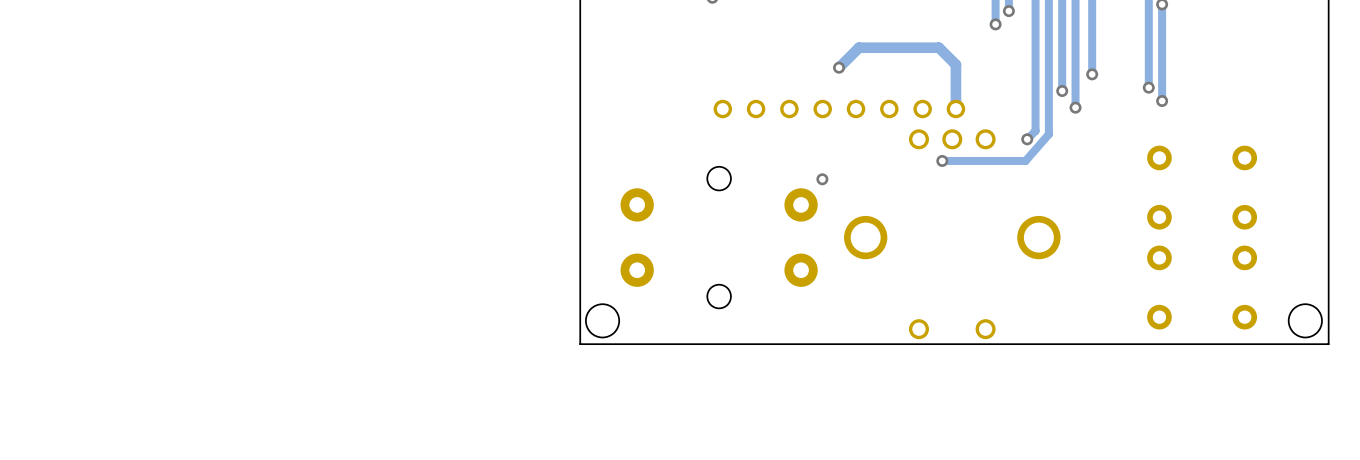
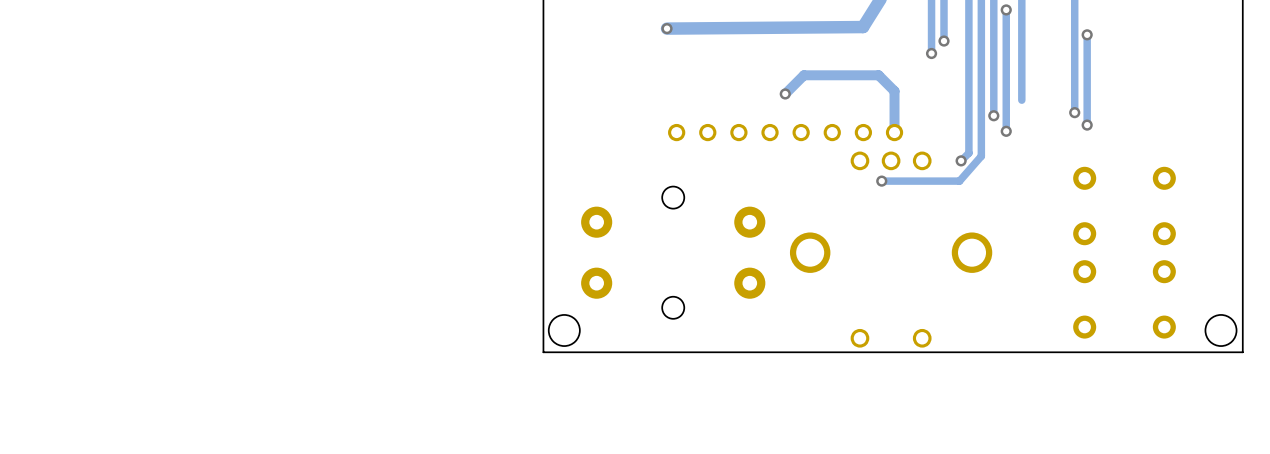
via: (1092, 74) -> none
via: (822, 179) -> none

